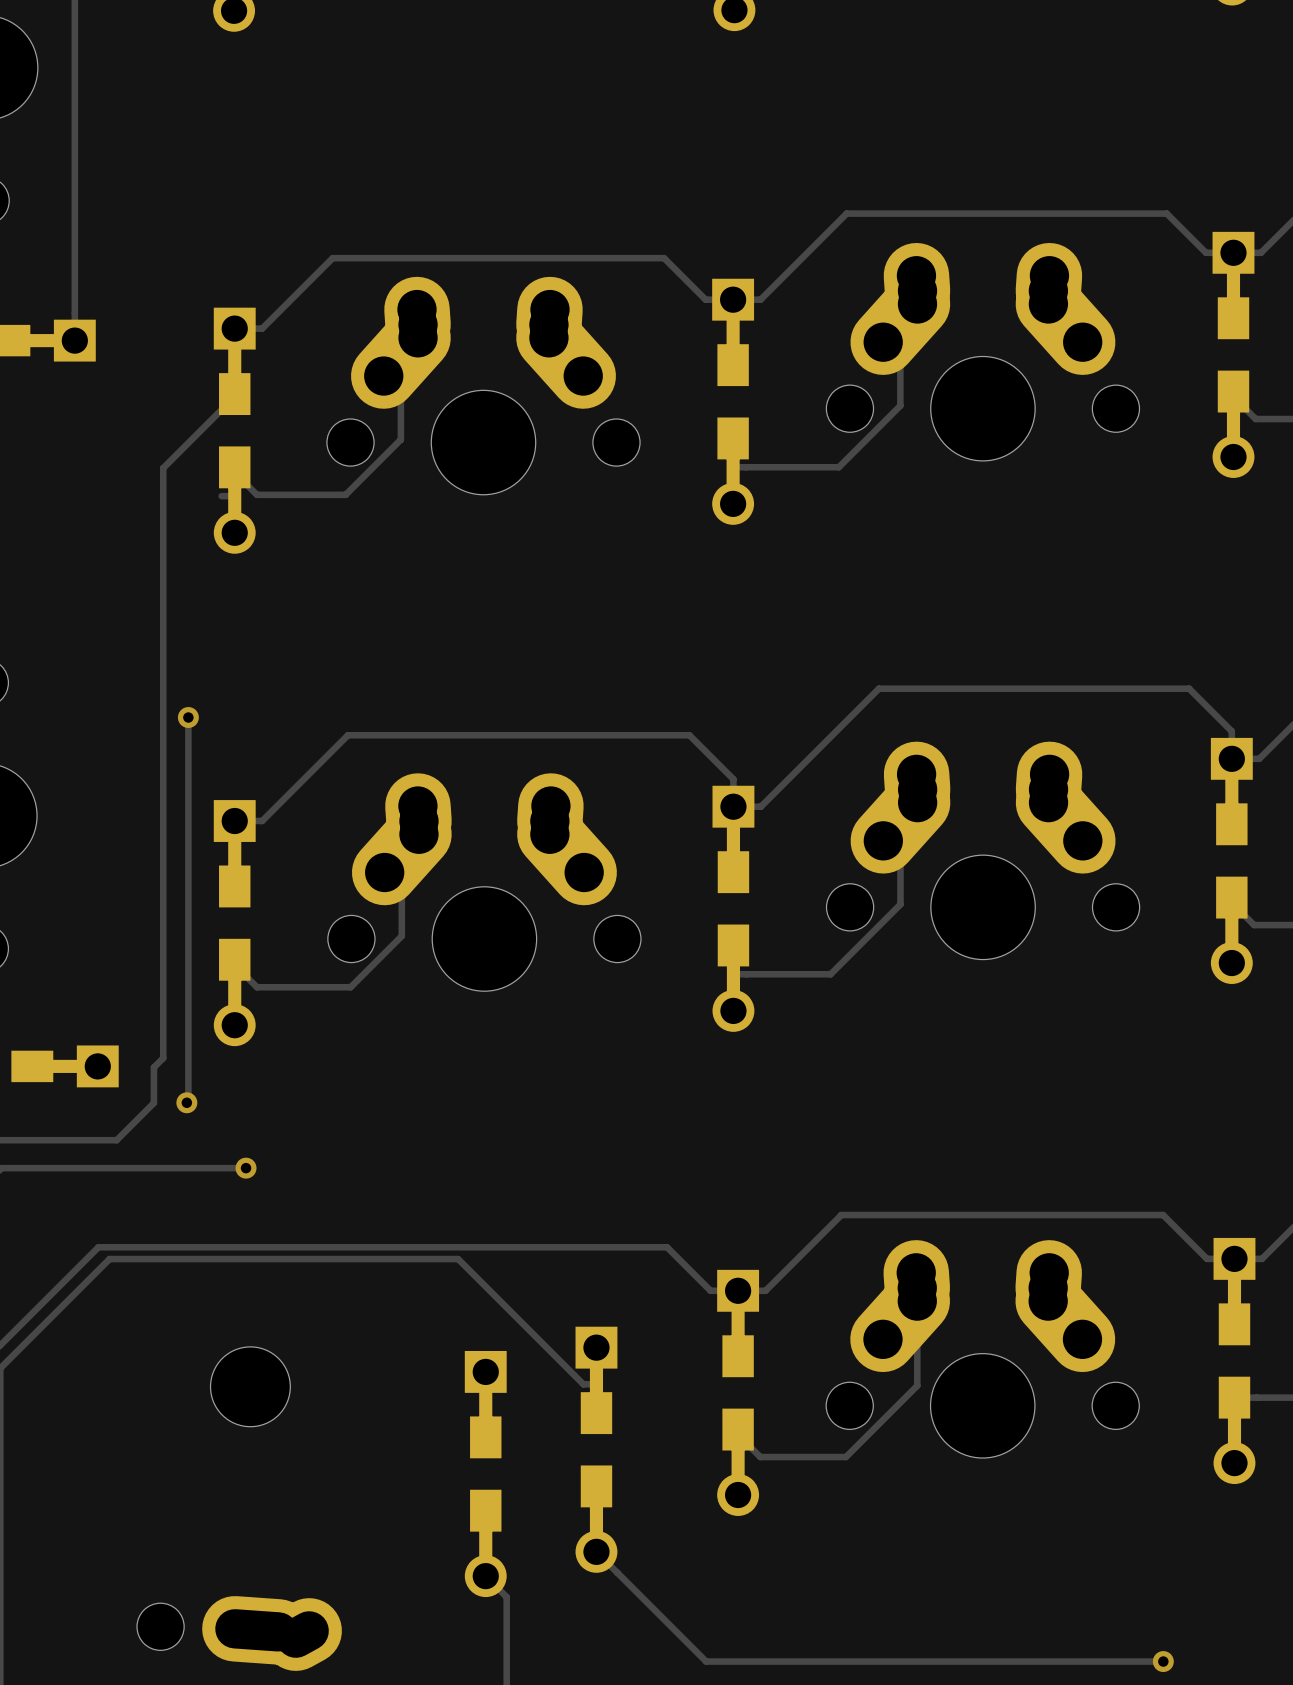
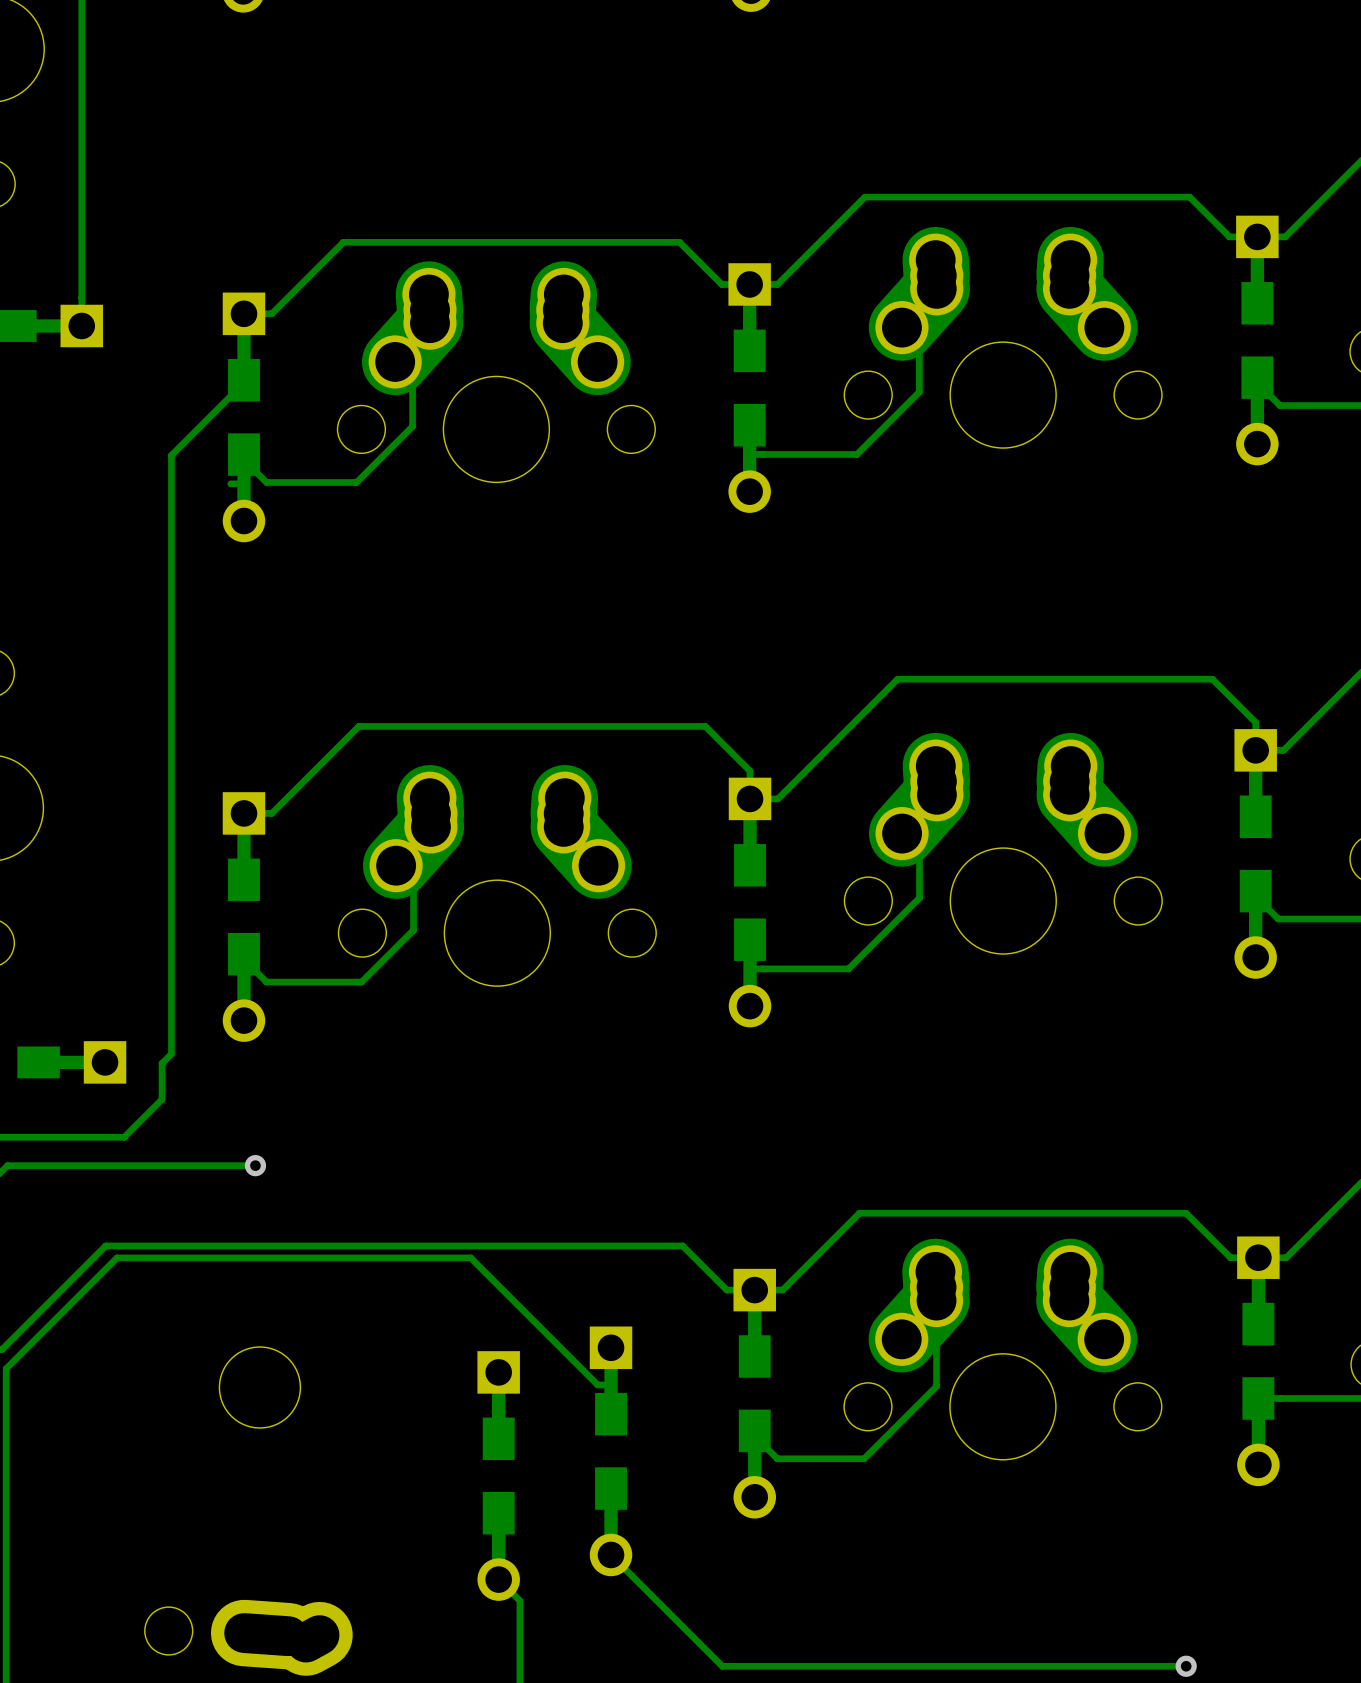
track: (188, 717) (188, 1101) (186, 1102) -> none
via: (188, 717) -> none
via: (186, 1102) -> none

